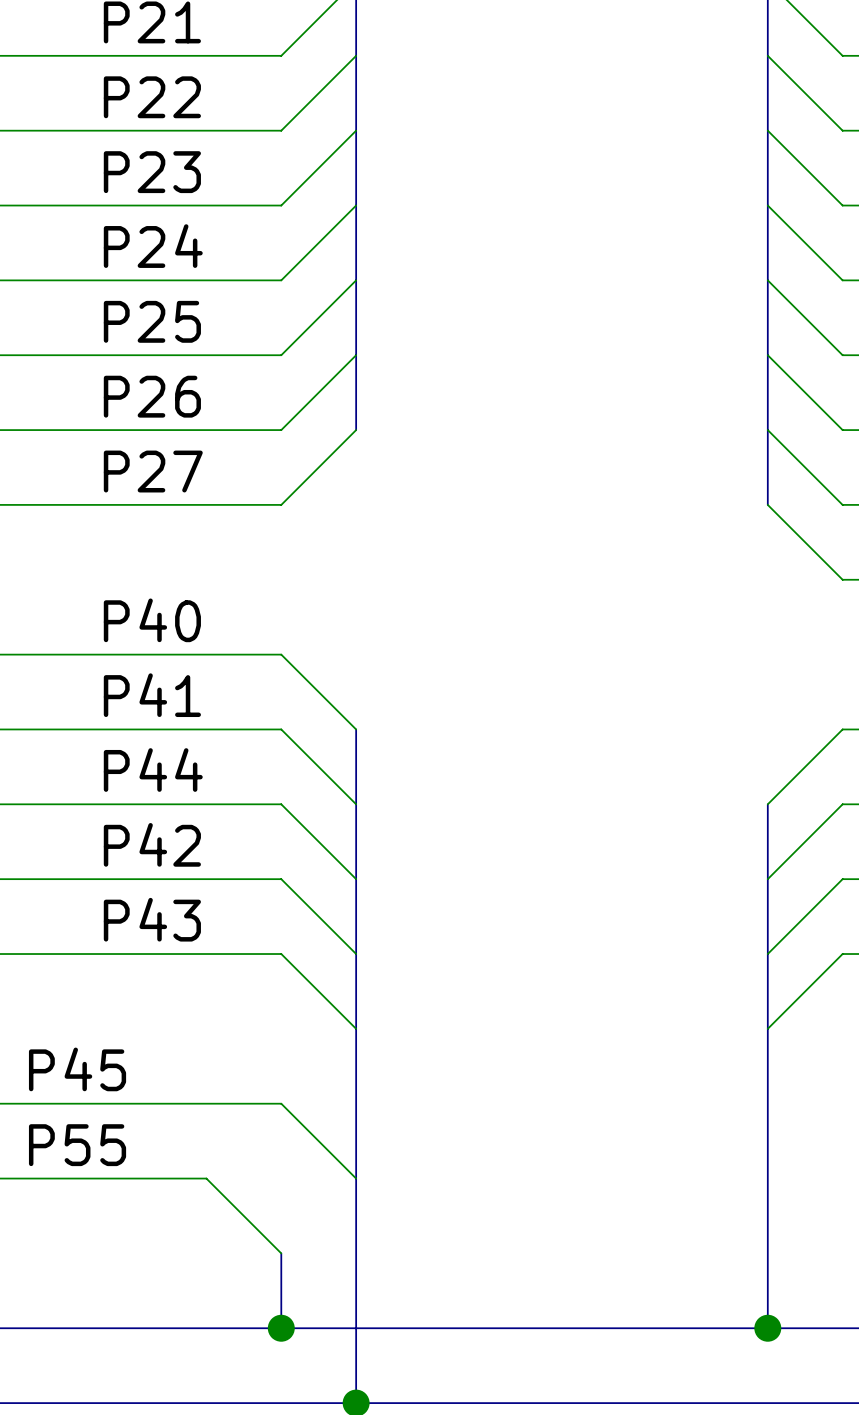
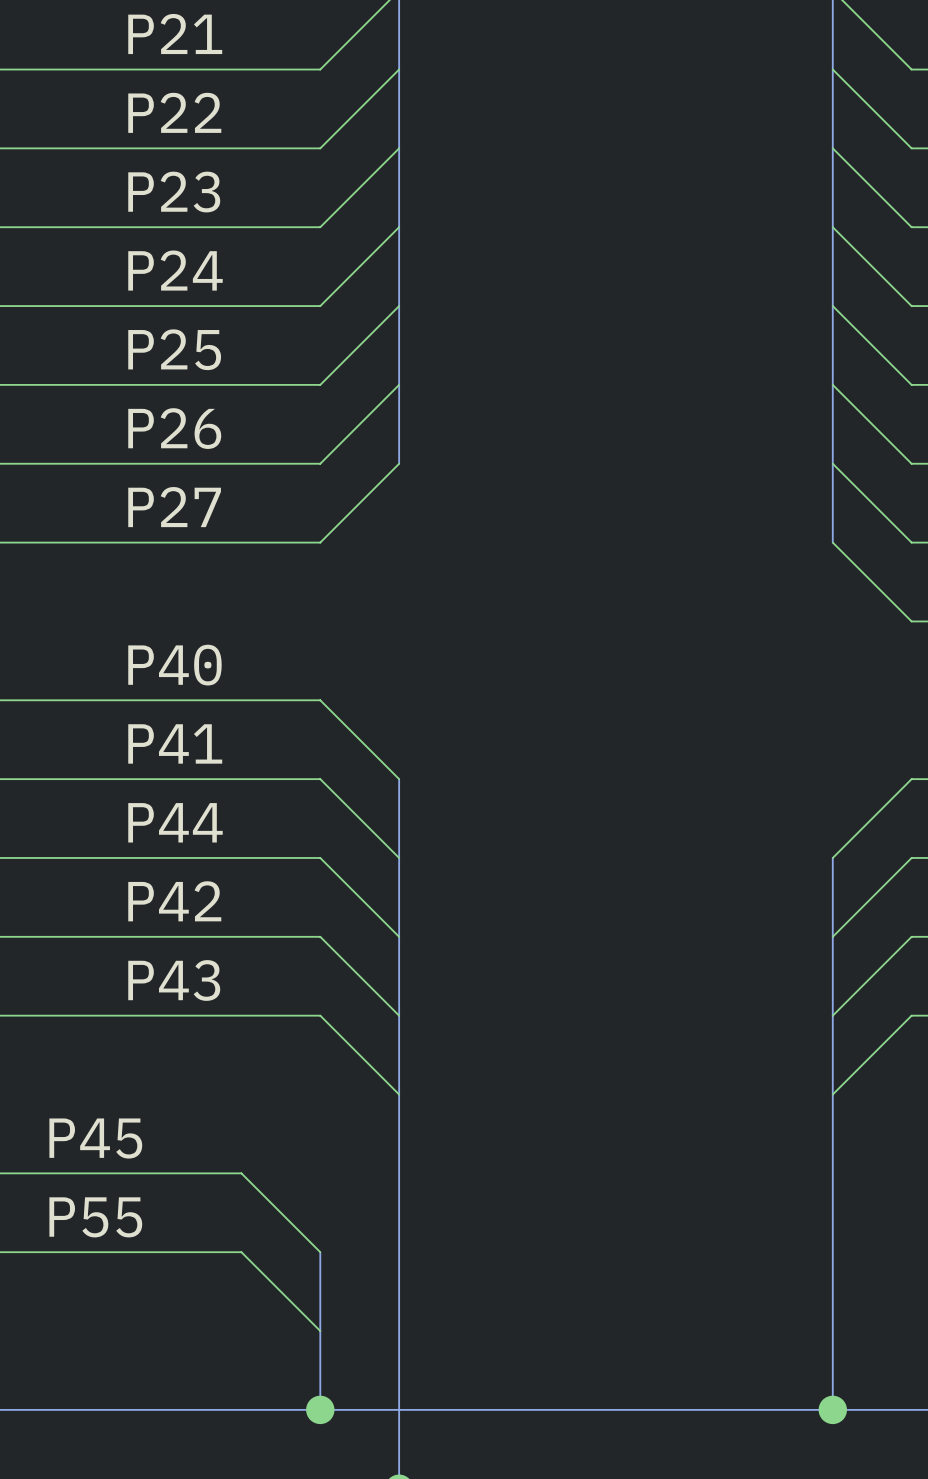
wire: (206, 1103) (281, 1103) (356, 1178) -> (241, 1173) (320, 1252)
bus: none -> (320, 1252) (320, 1331)

